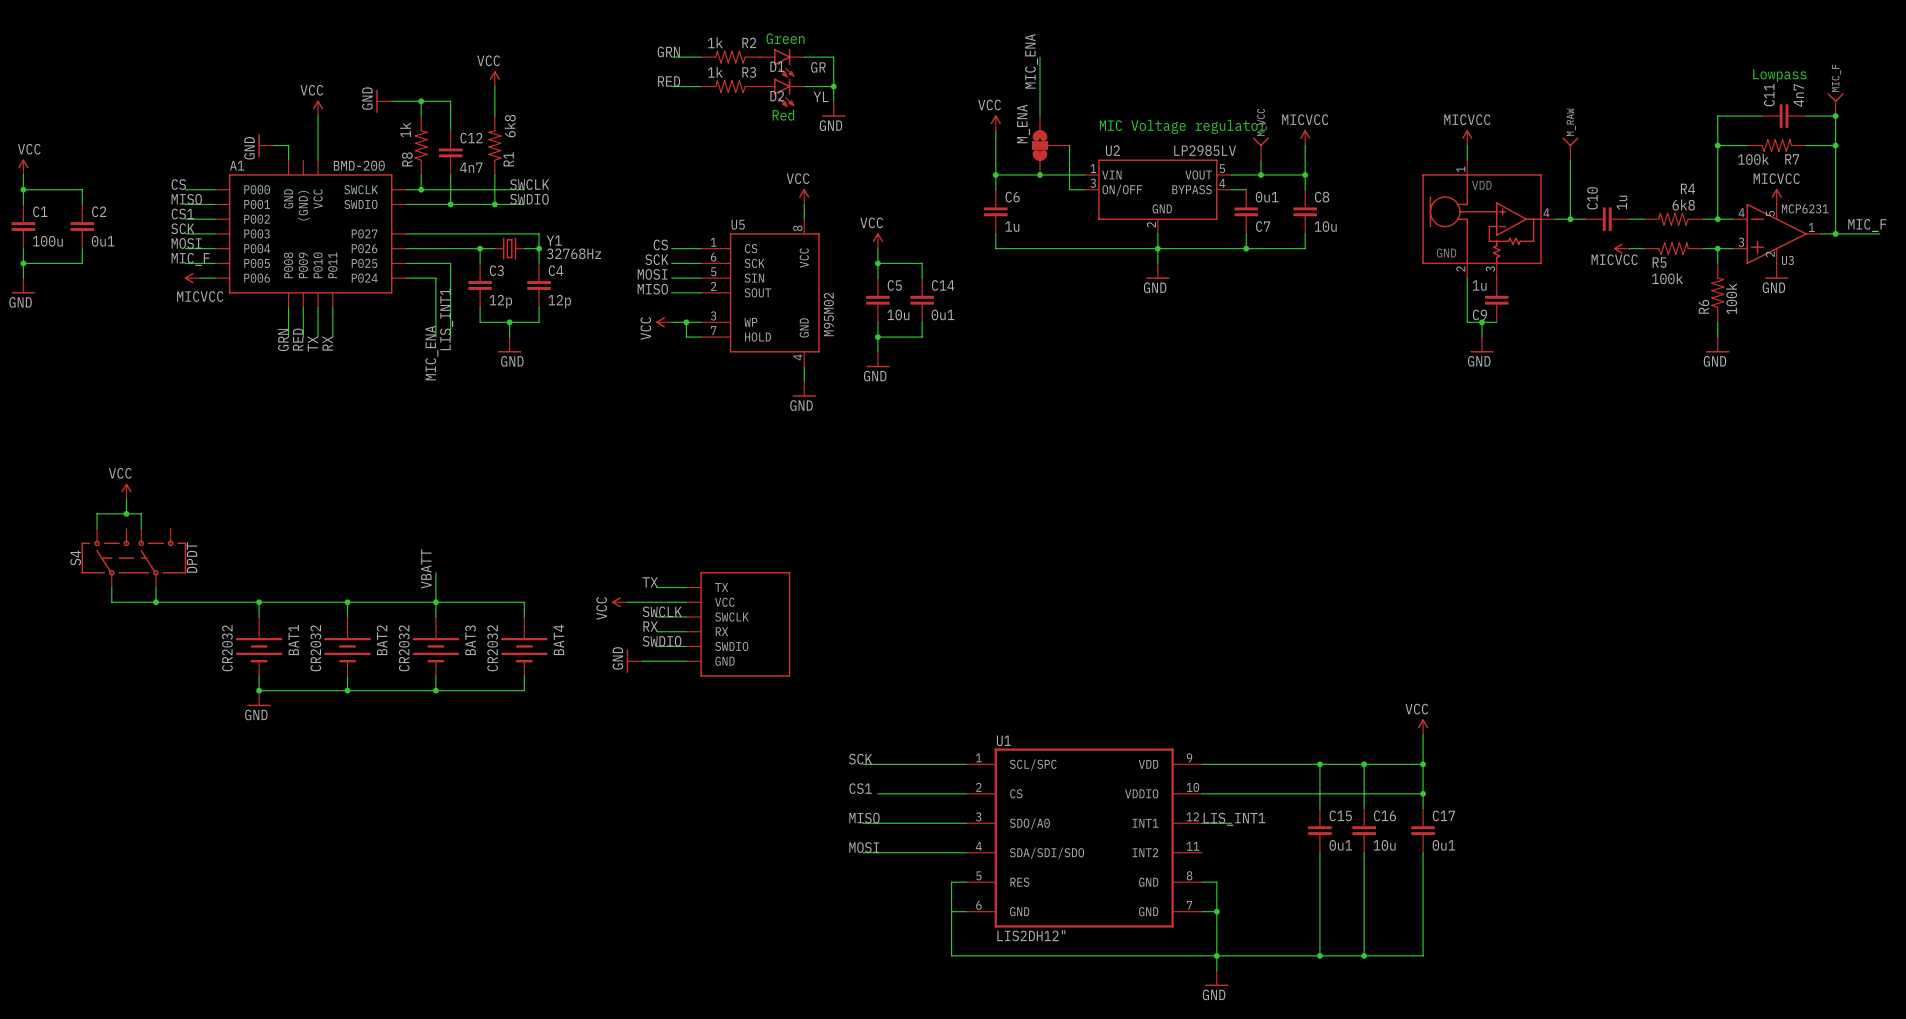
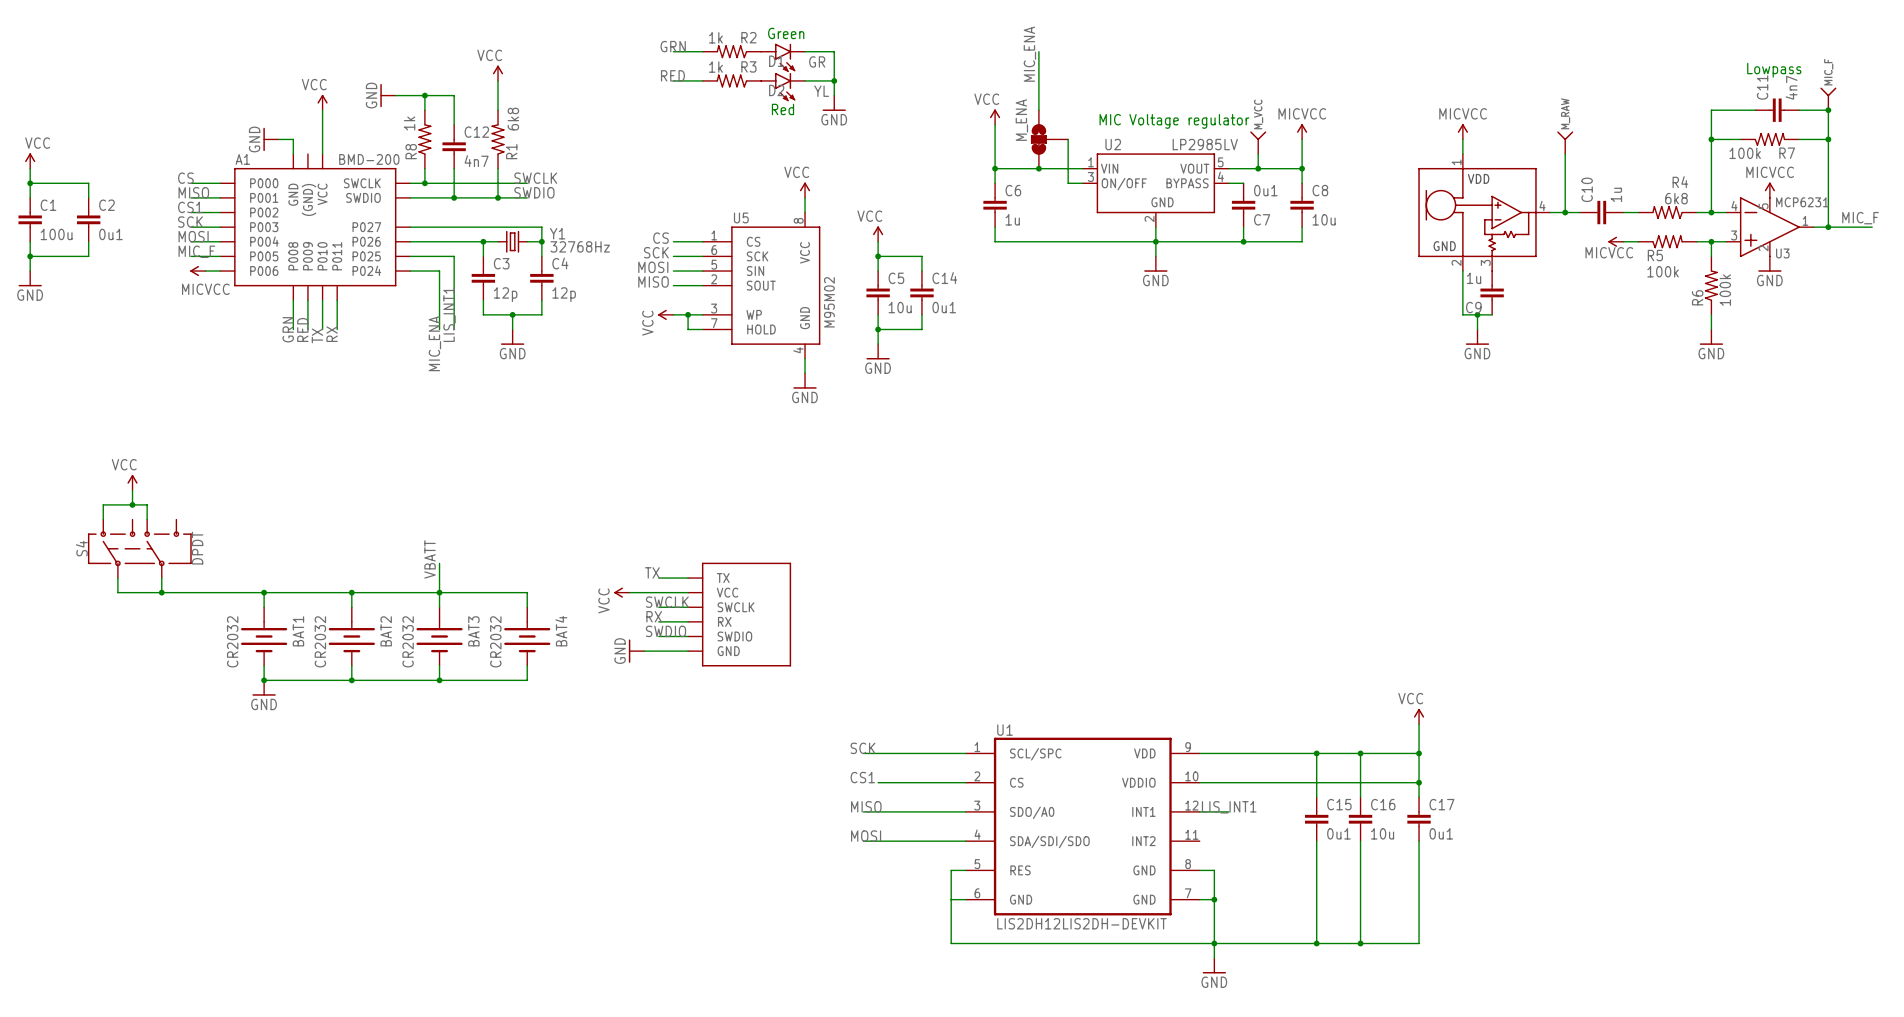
U1 value: LIS2DH12" (1031, 935) -> LIS2DH12LIS2DH-DEVKIT (1082, 923)

